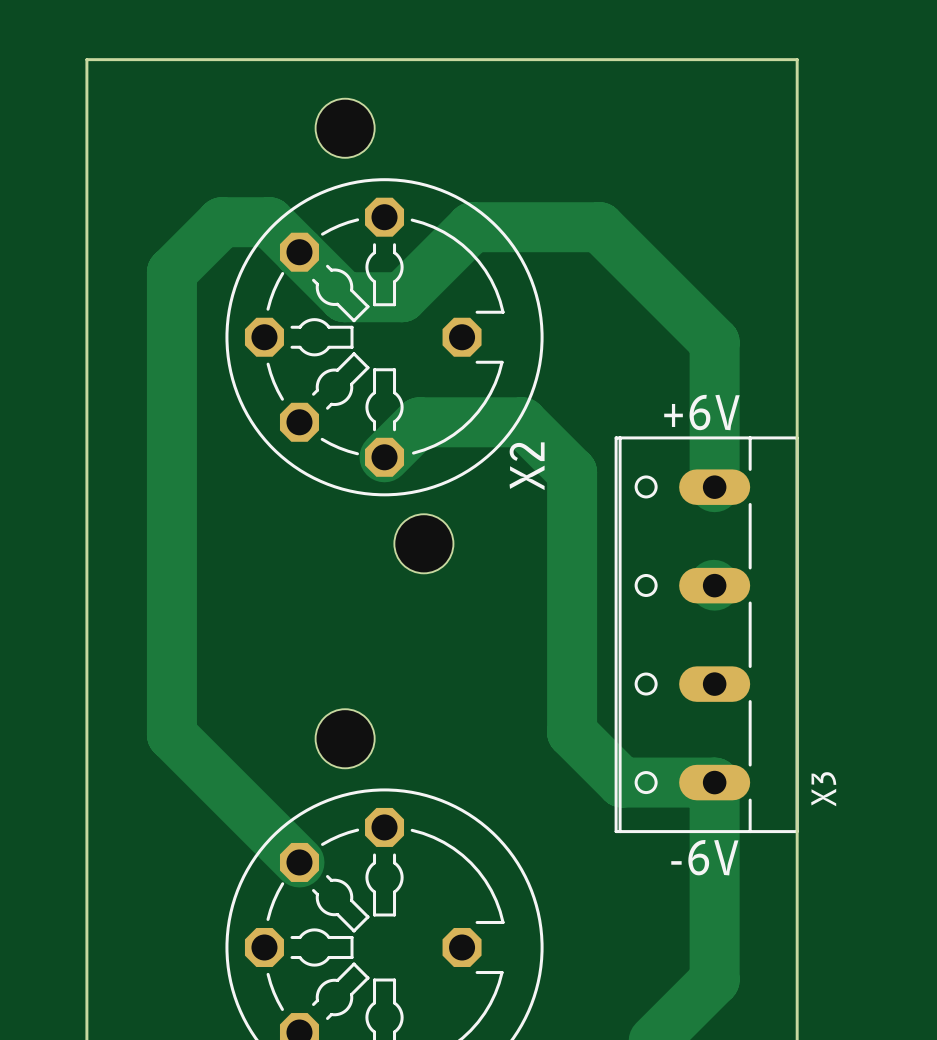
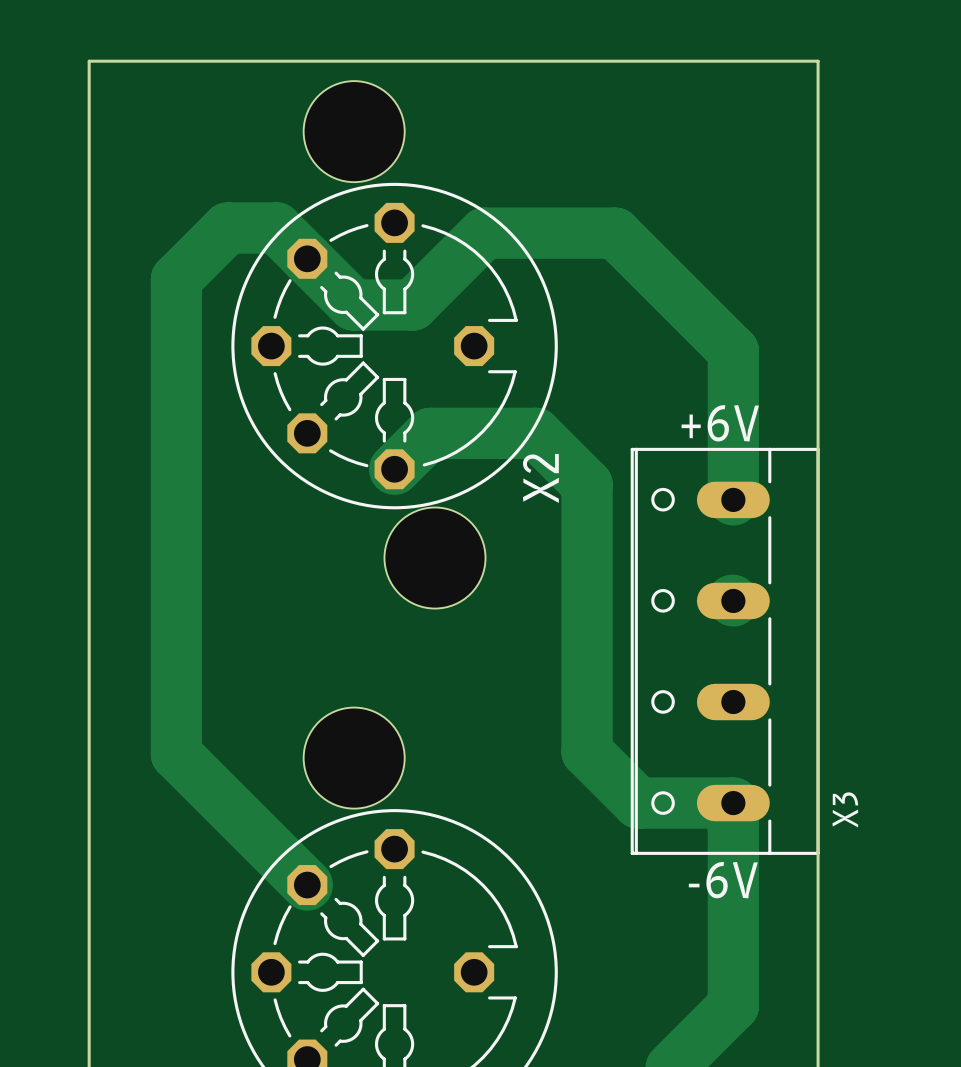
hole size: [315, 98, 375, 158] -> [303, 81, 405, 183]
hole size: [394, 514, 454, 574] -> [384, 507, 486, 609]
hole size: [315, 709, 375, 769] -> [303, 707, 405, 809]

